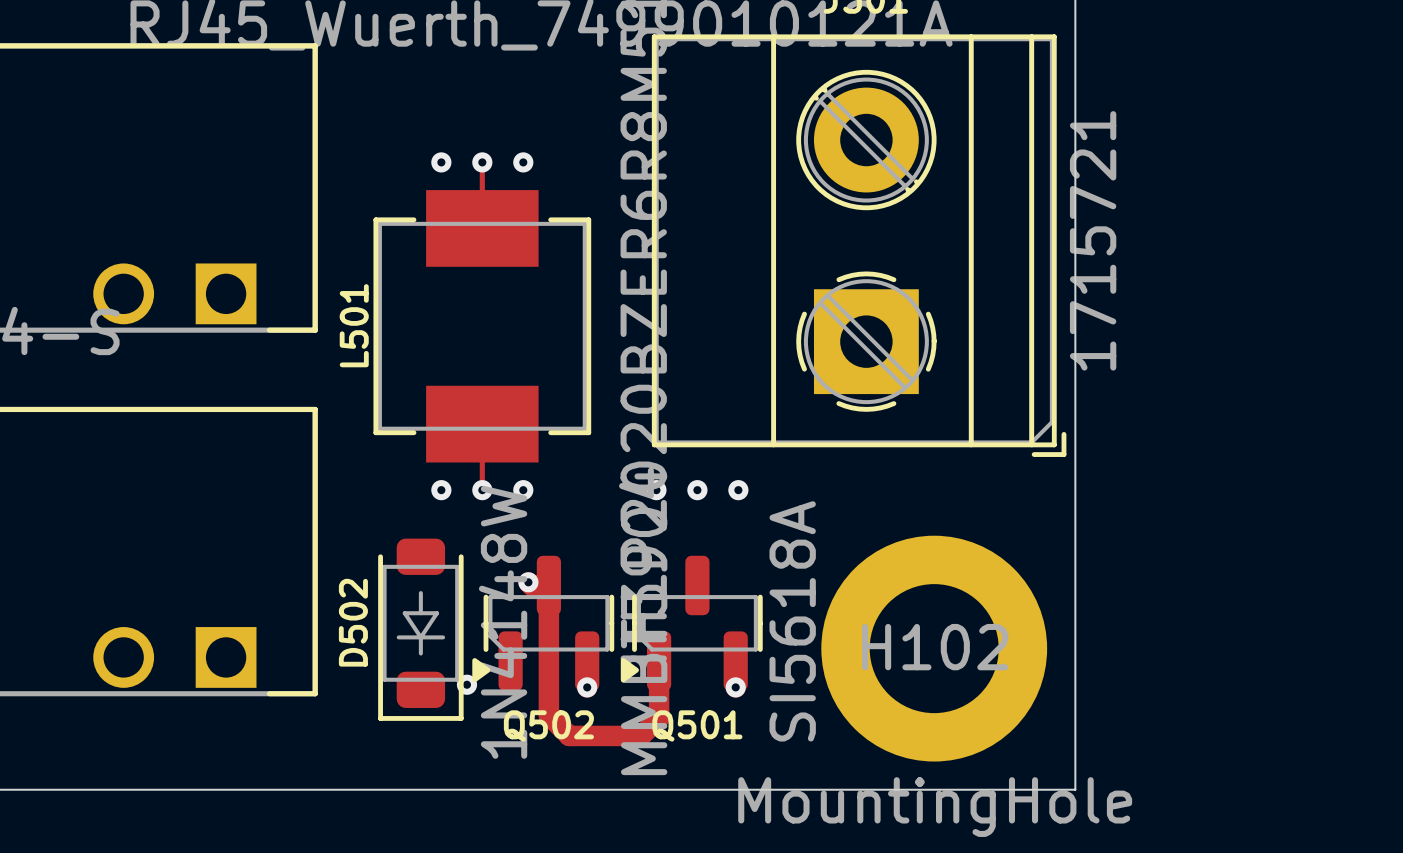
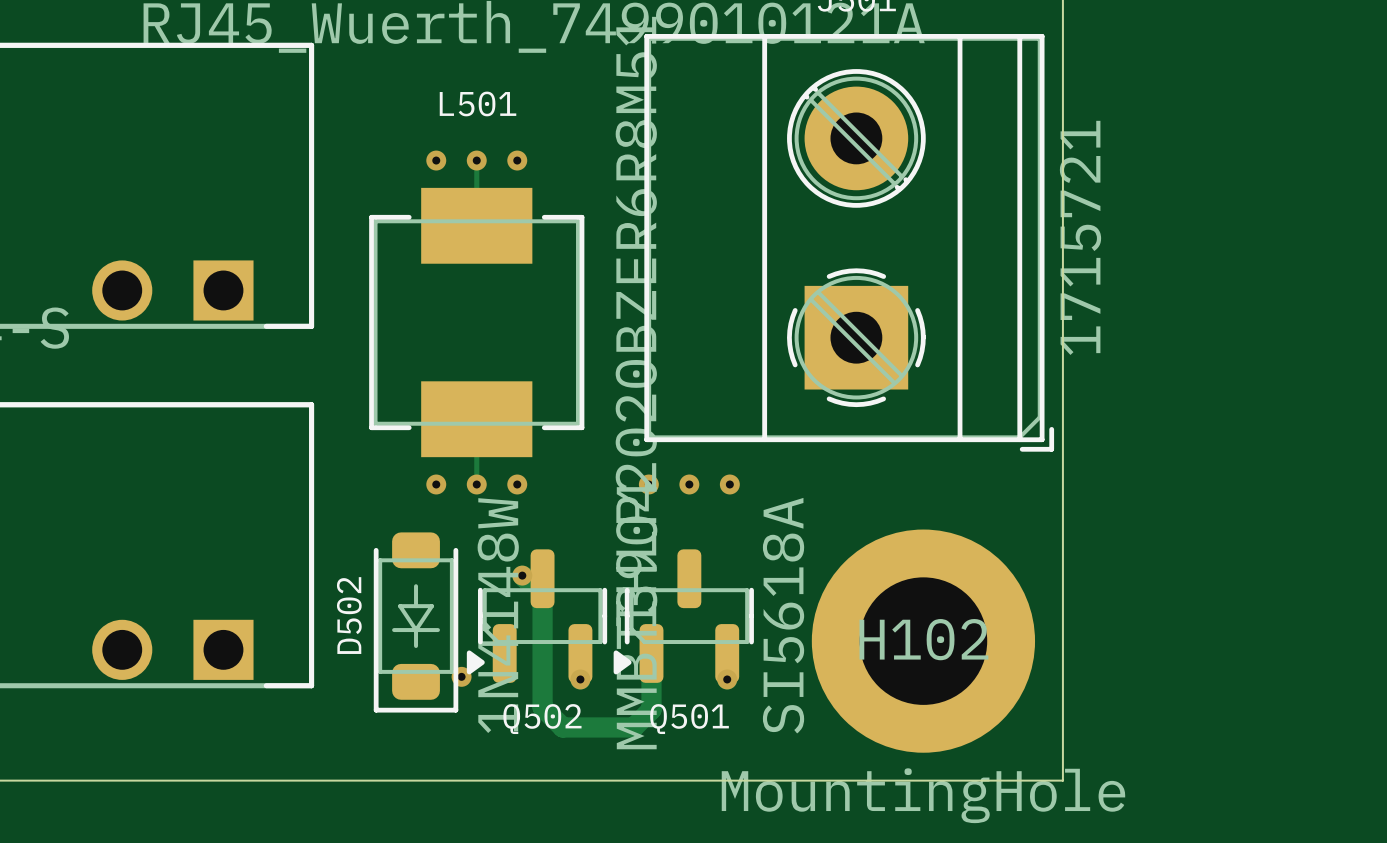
L501 name rotation: 0° (354, 325) -> 90° clockwise (478, 103)
L501 name position: L501 (354, 325) -> L501 (478, 103)

